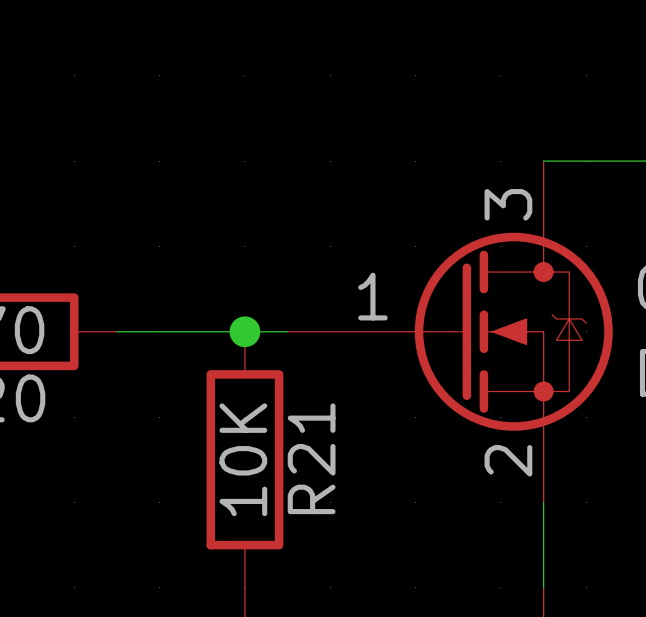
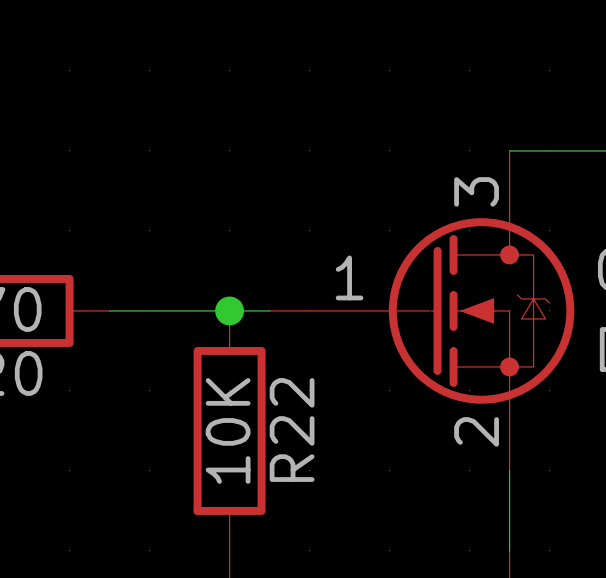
R21 name: R21 (311, 458) -> R22 (292, 430)

